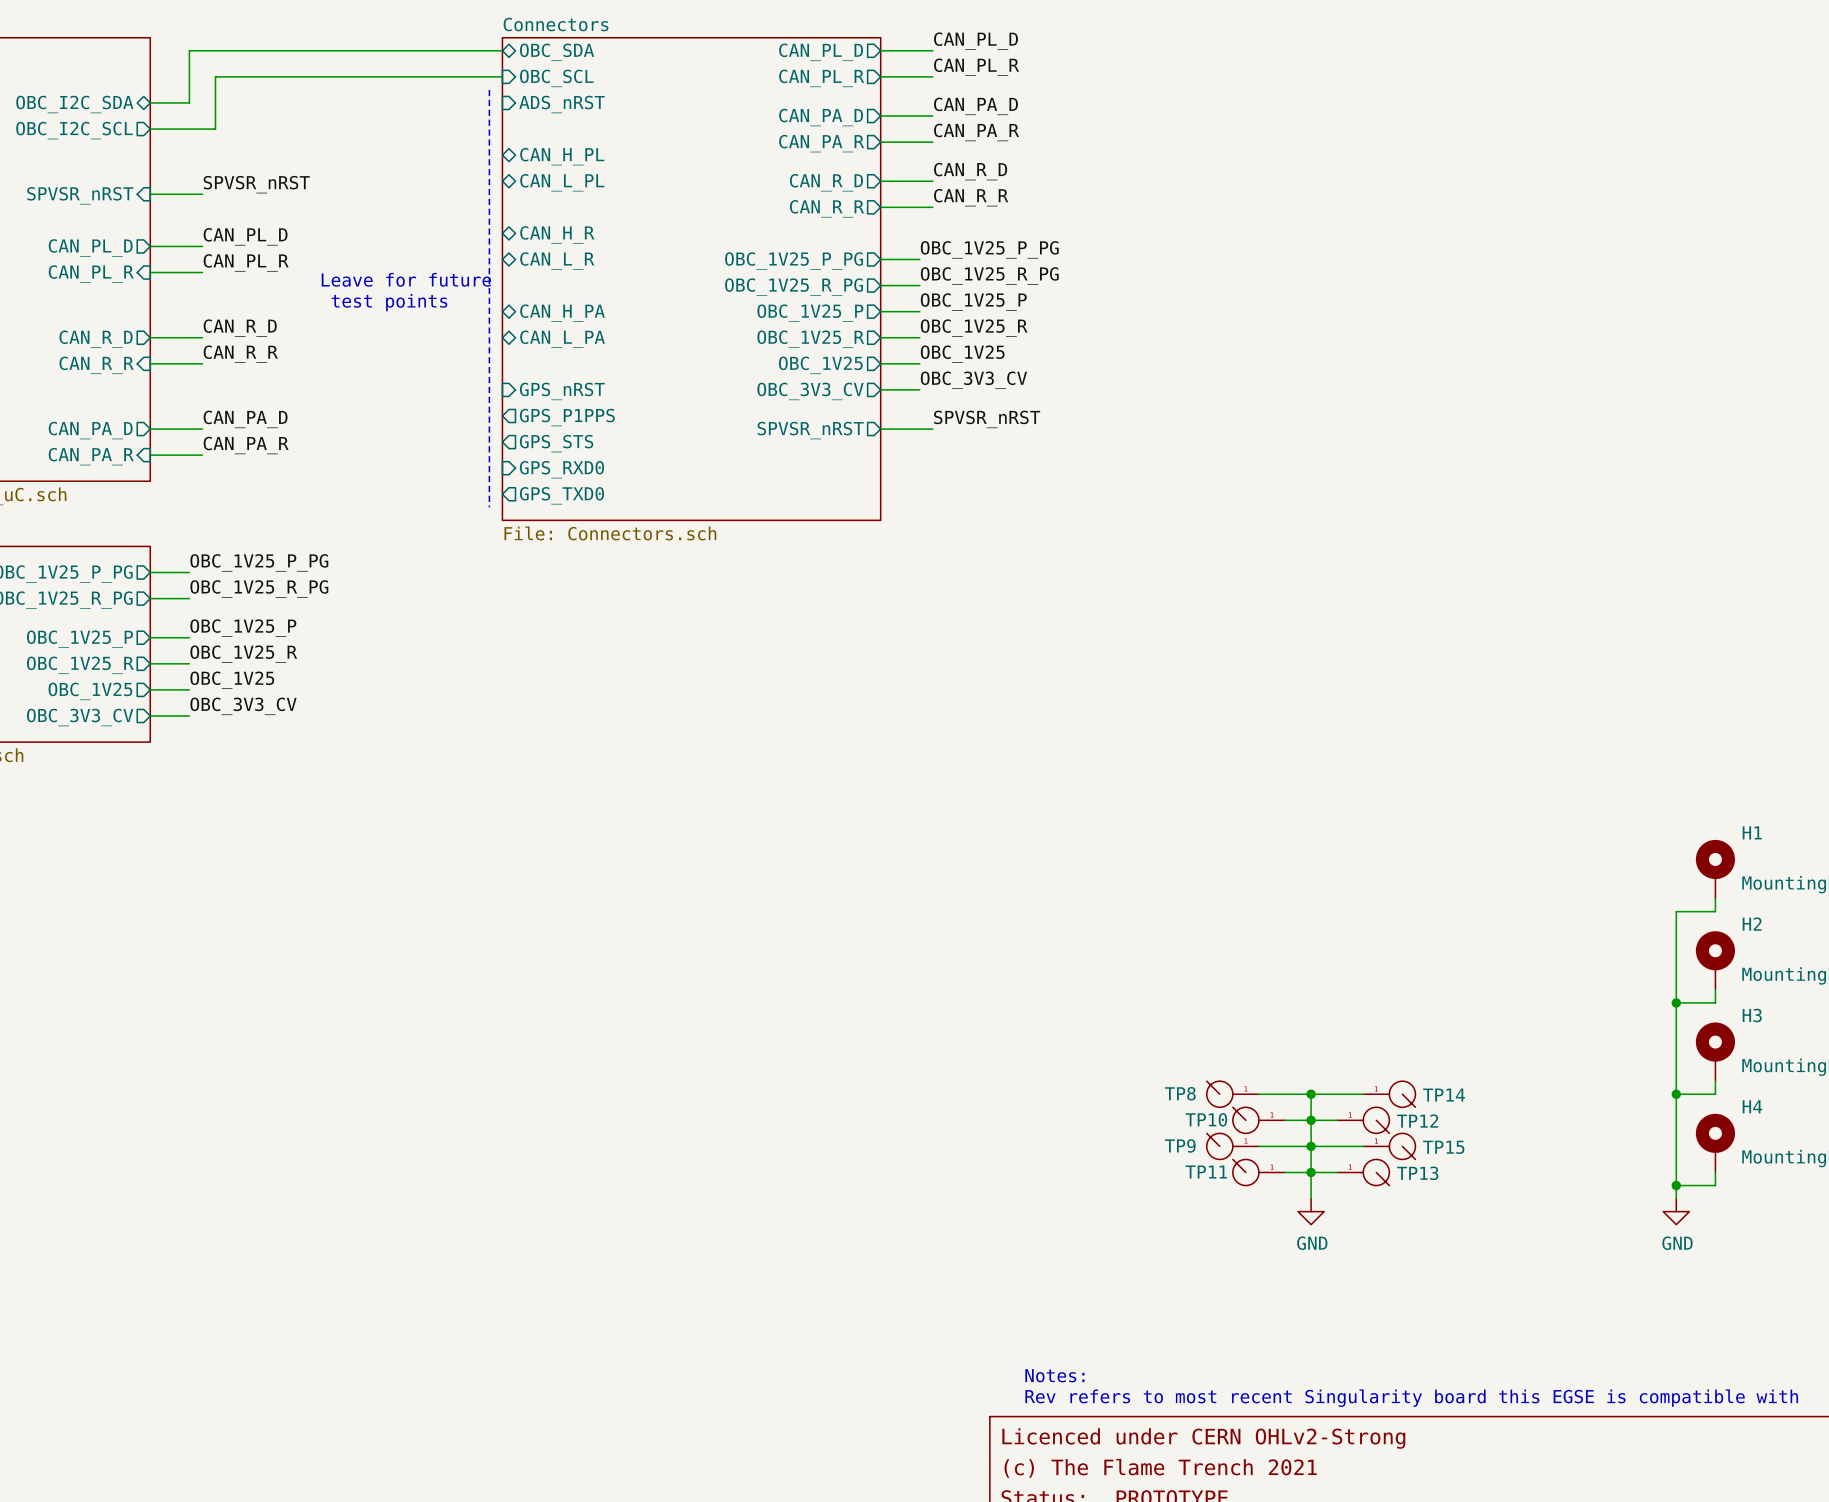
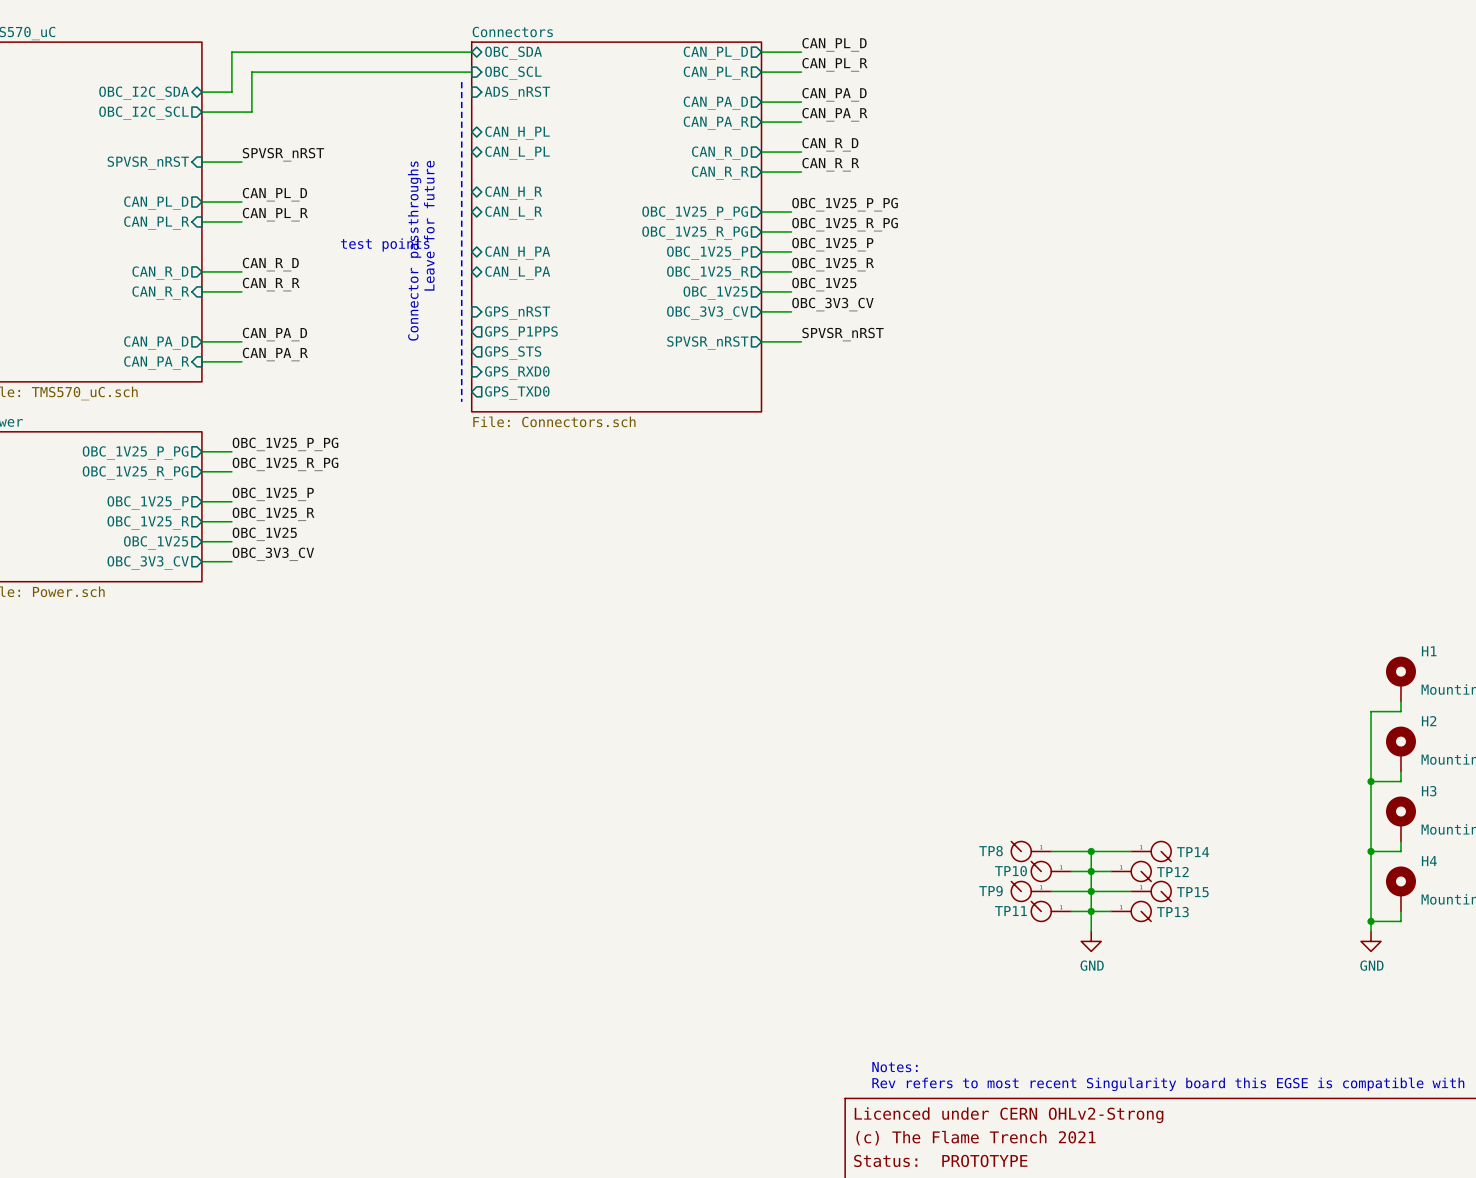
text rotation: 0° (406, 279) -> 90° counterclockwise (429, 225)
text: none -> Connector passthroughs (414, 251)

